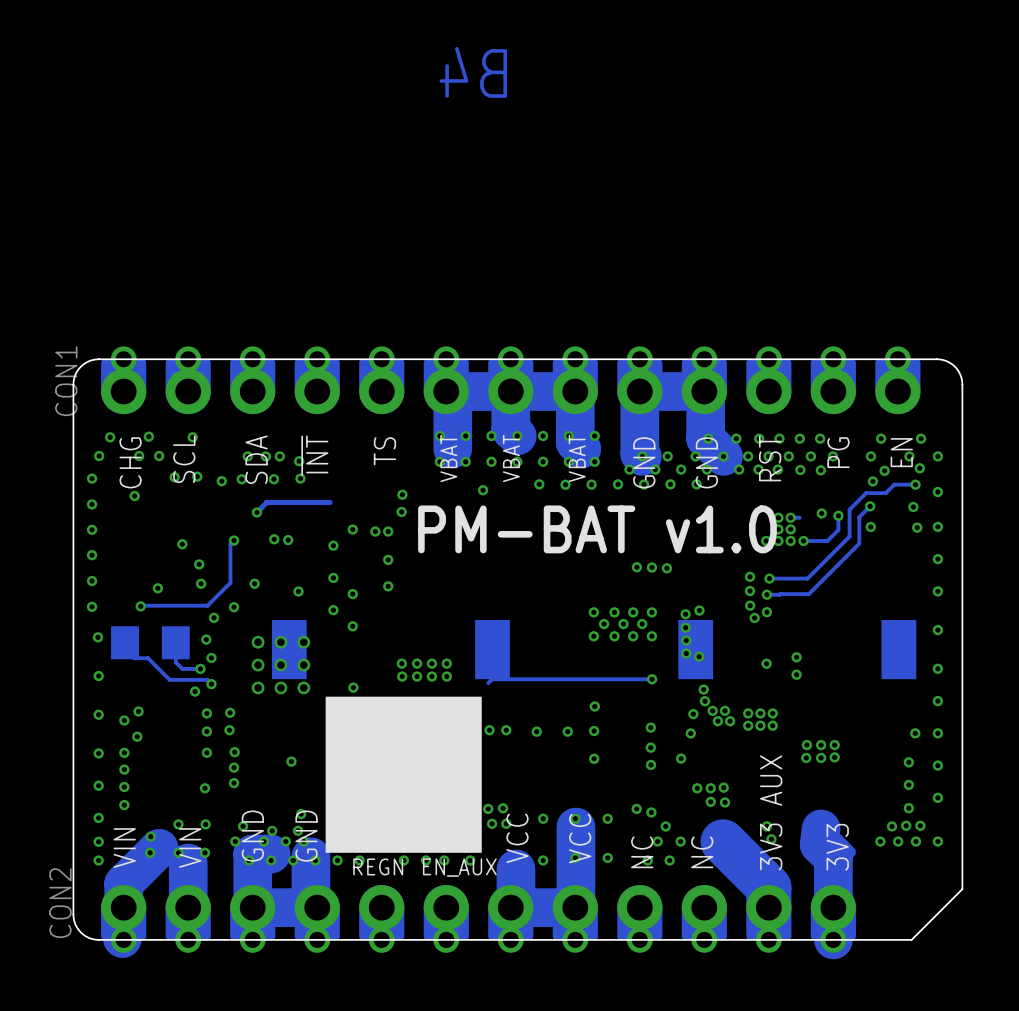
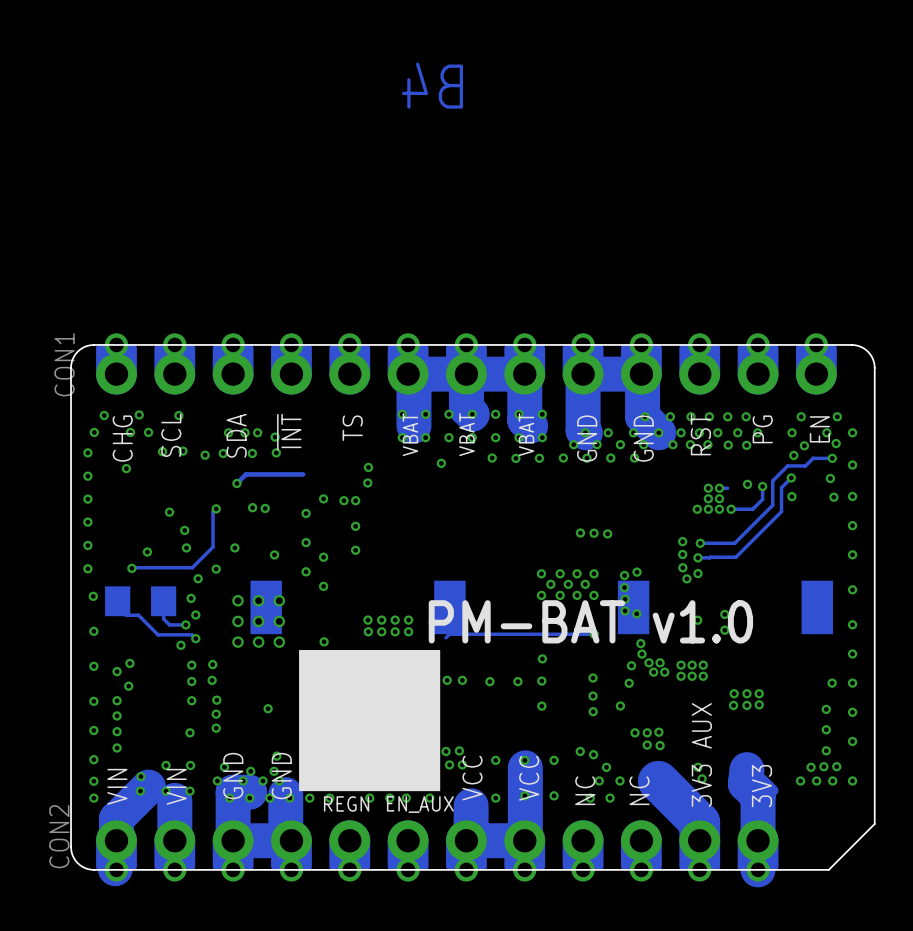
text position: PM-BAT v1.0 (597, 529) -> PM-BAT v1.0 (590, 621)

